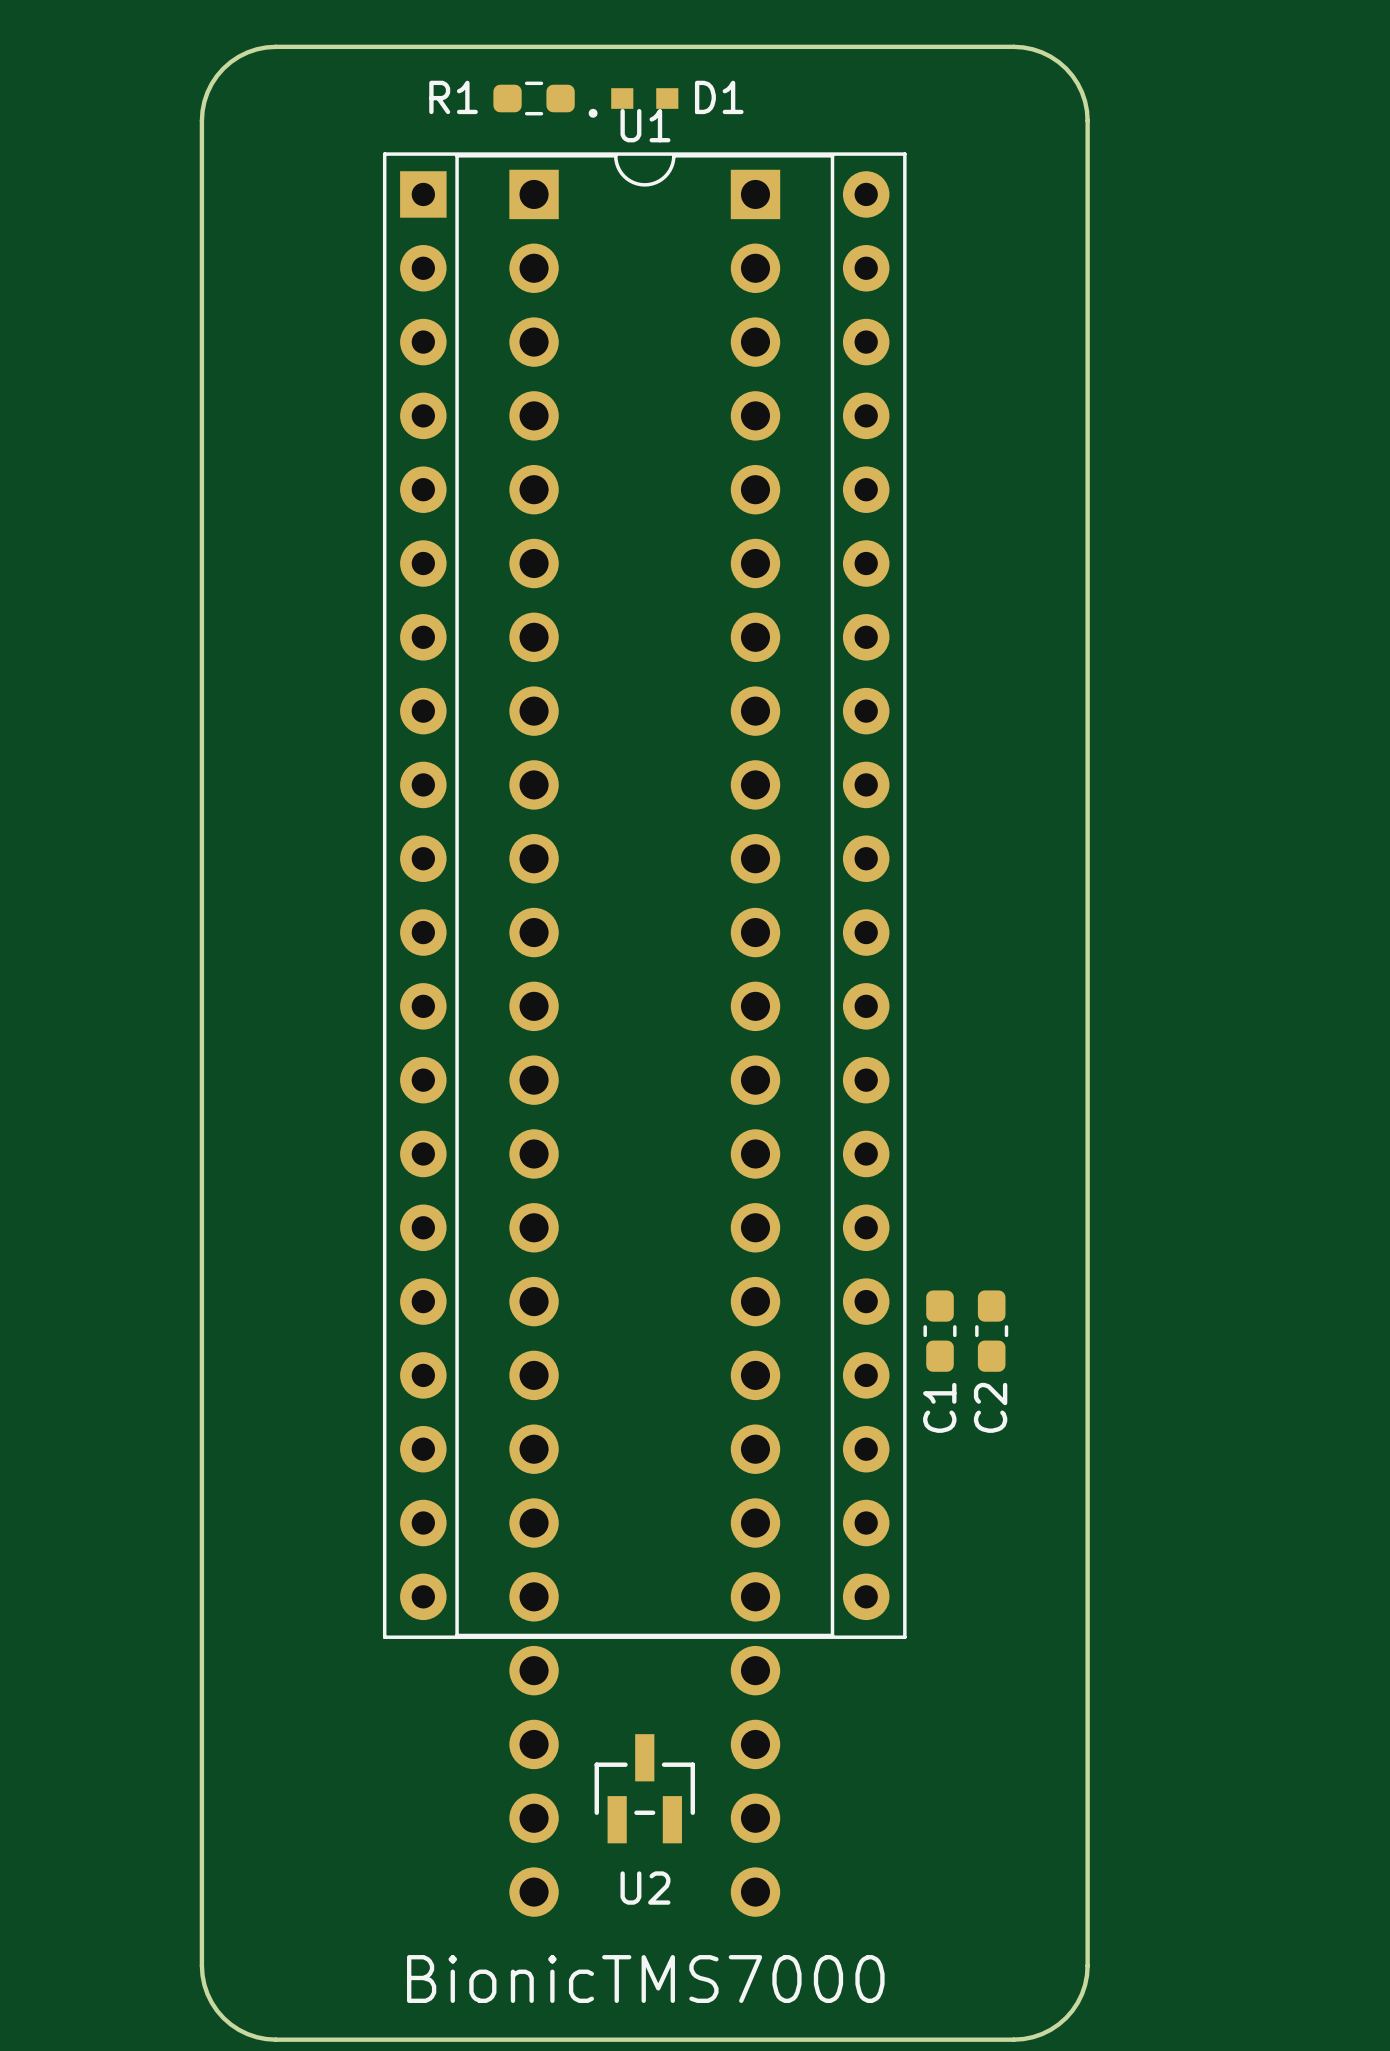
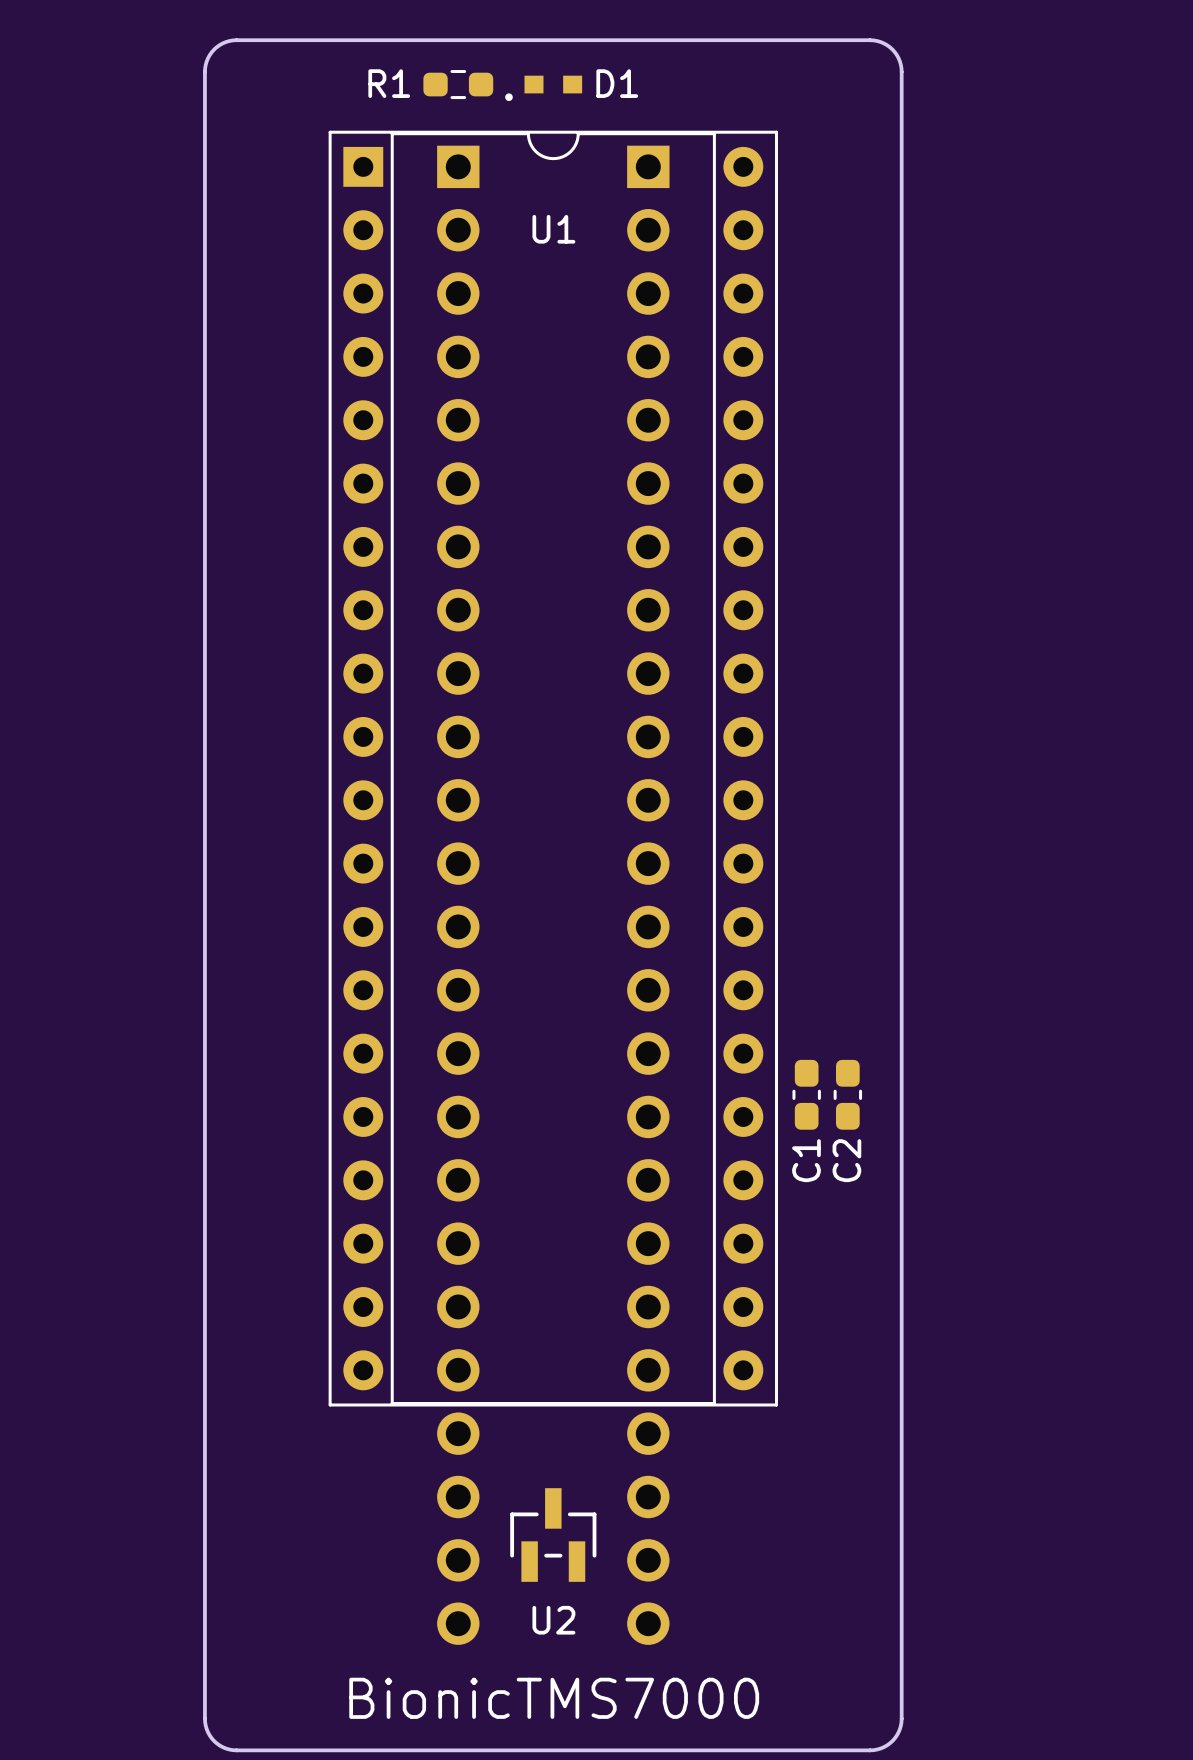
board edge: (275, 46) (247, 52) (223, 68) (207, 92) (201, 120) (201, 1965) (207, 1994) (223, 2018) (247, 2034) (275, 2039) -> (236, 40) (226, 41) (214, 49) (206, 61) (204, 71) (204, 1718) (206, 1729) (214, 1741) (226, 1748) (236, 1750)
board edge: (1013, 46) (1042, 52) (1066, 68) (1082, 92) (1087, 120) (1087, 1965) (1082, 1994) (1066, 2018) (1042, 2034) (1013, 2039) -> (870, 40) (880, 41) (892, 49) (899, 61) (901, 71) (901, 1718) (899, 1729) (892, 1741) (880, 1748) (870, 1750)
U1 name position: U1 (645, 125) -> U1 (553, 229)
C1 position: (940, 1331) -> (806, 1094)
C2 position: (991, 1331) -> (847, 1094)

